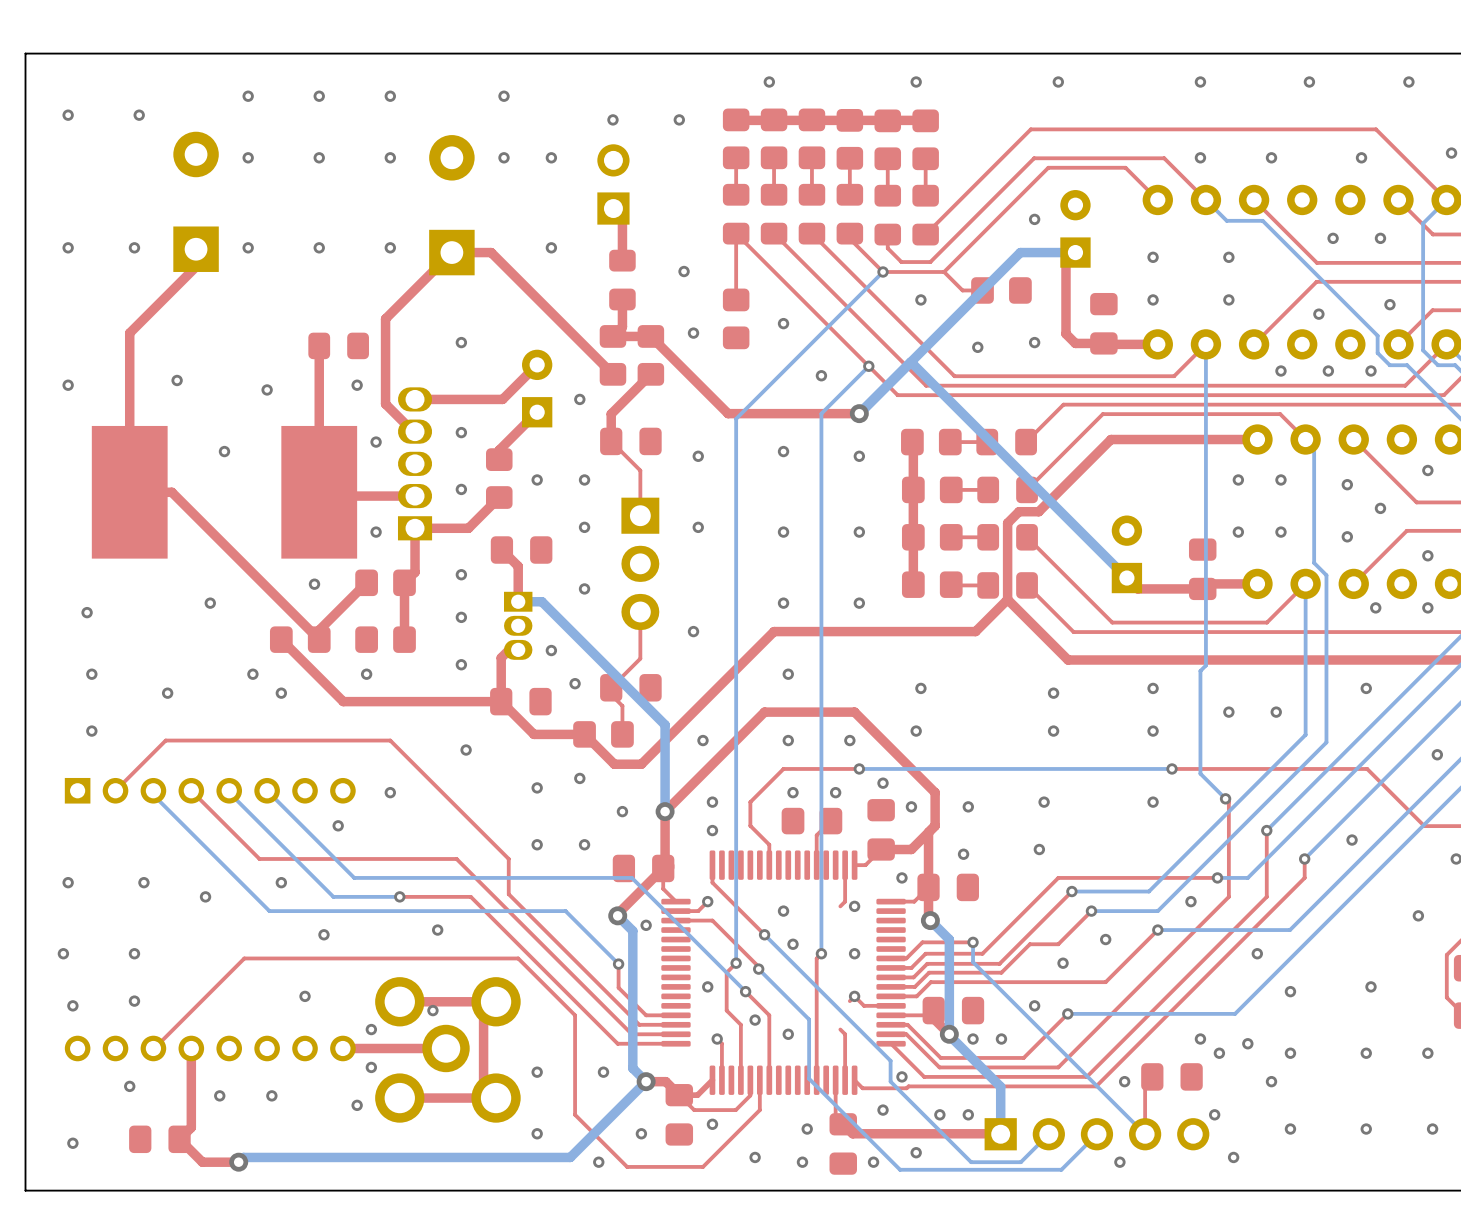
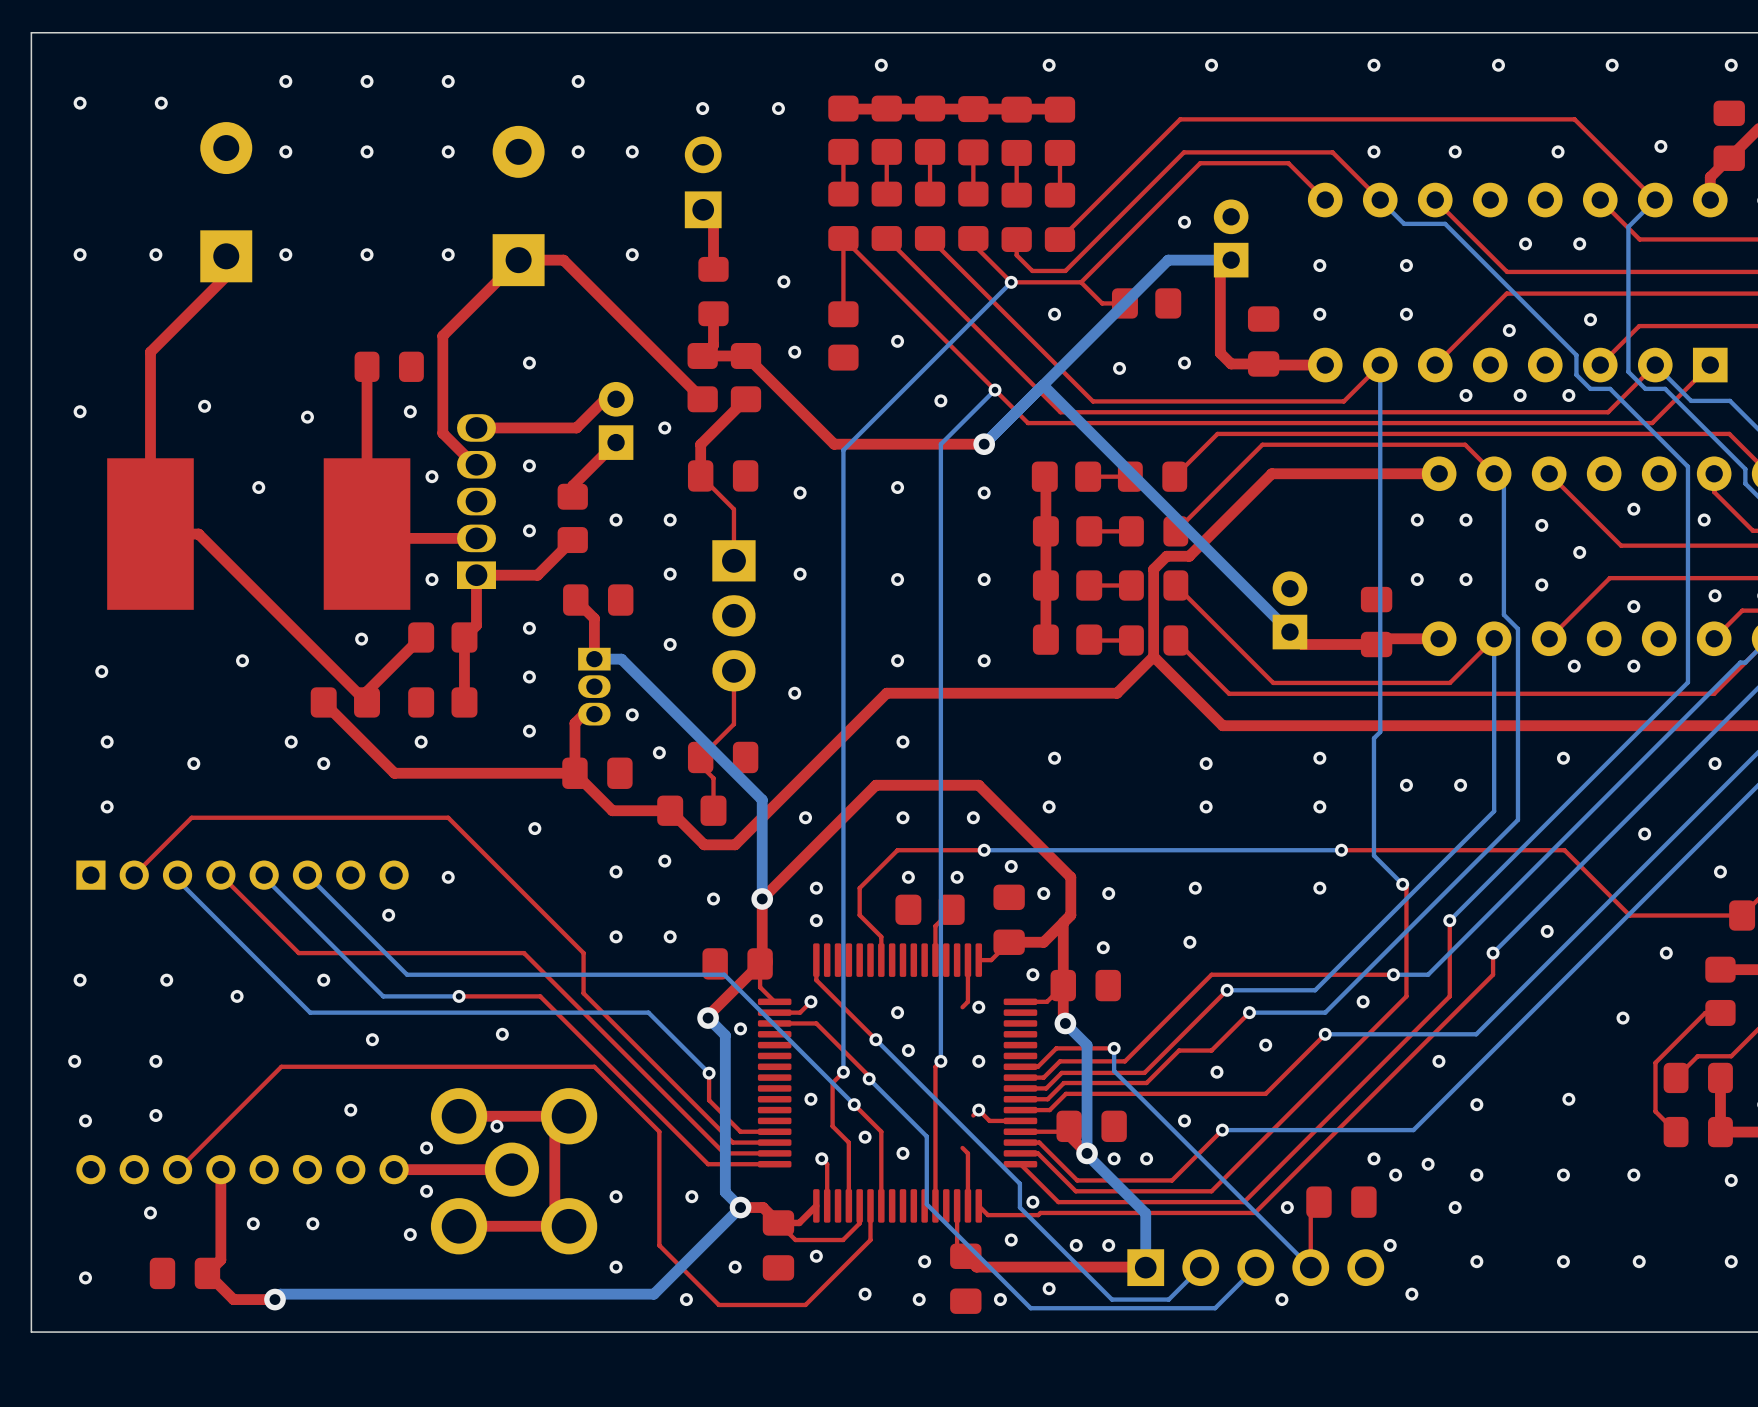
part footprint: [1060, 190, 1091, 268] -> [1213, 199, 1249, 278]
part footprint: [522, 349, 553, 428] -> [598, 381, 634, 460]
part footprint: [1111, 515, 1143, 594] -> [1272, 571, 1308, 650]

